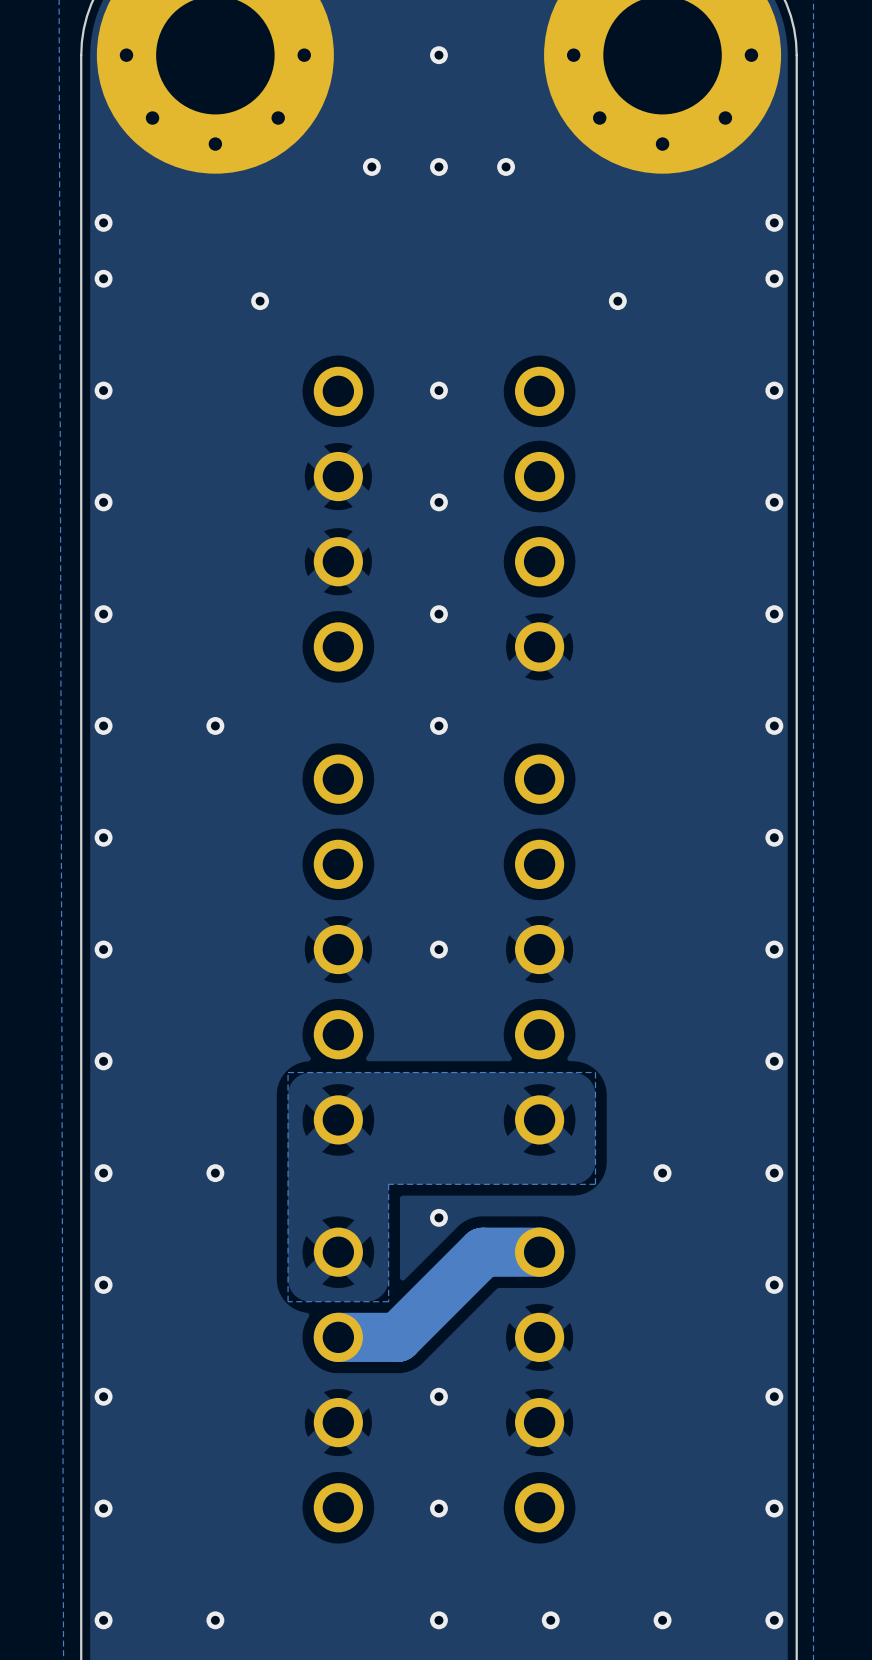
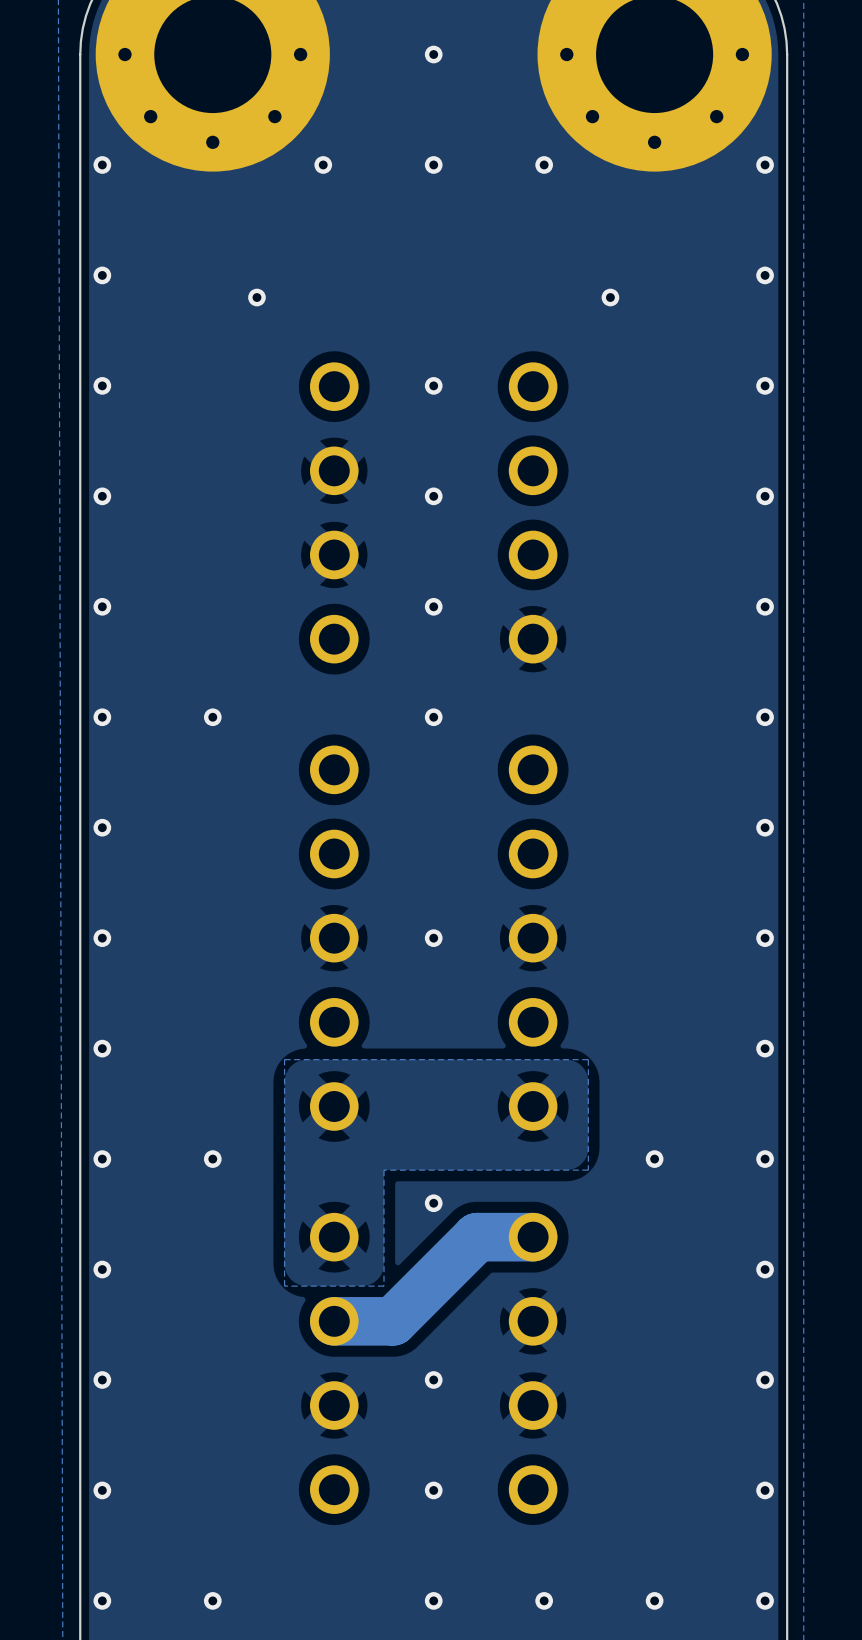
via position: (371, 166) -> (323, 164)
via position: (506, 166) -> (544, 164)
via position: (103, 222) -> (102, 164)
via position: (774, 222) -> (765, 164)

